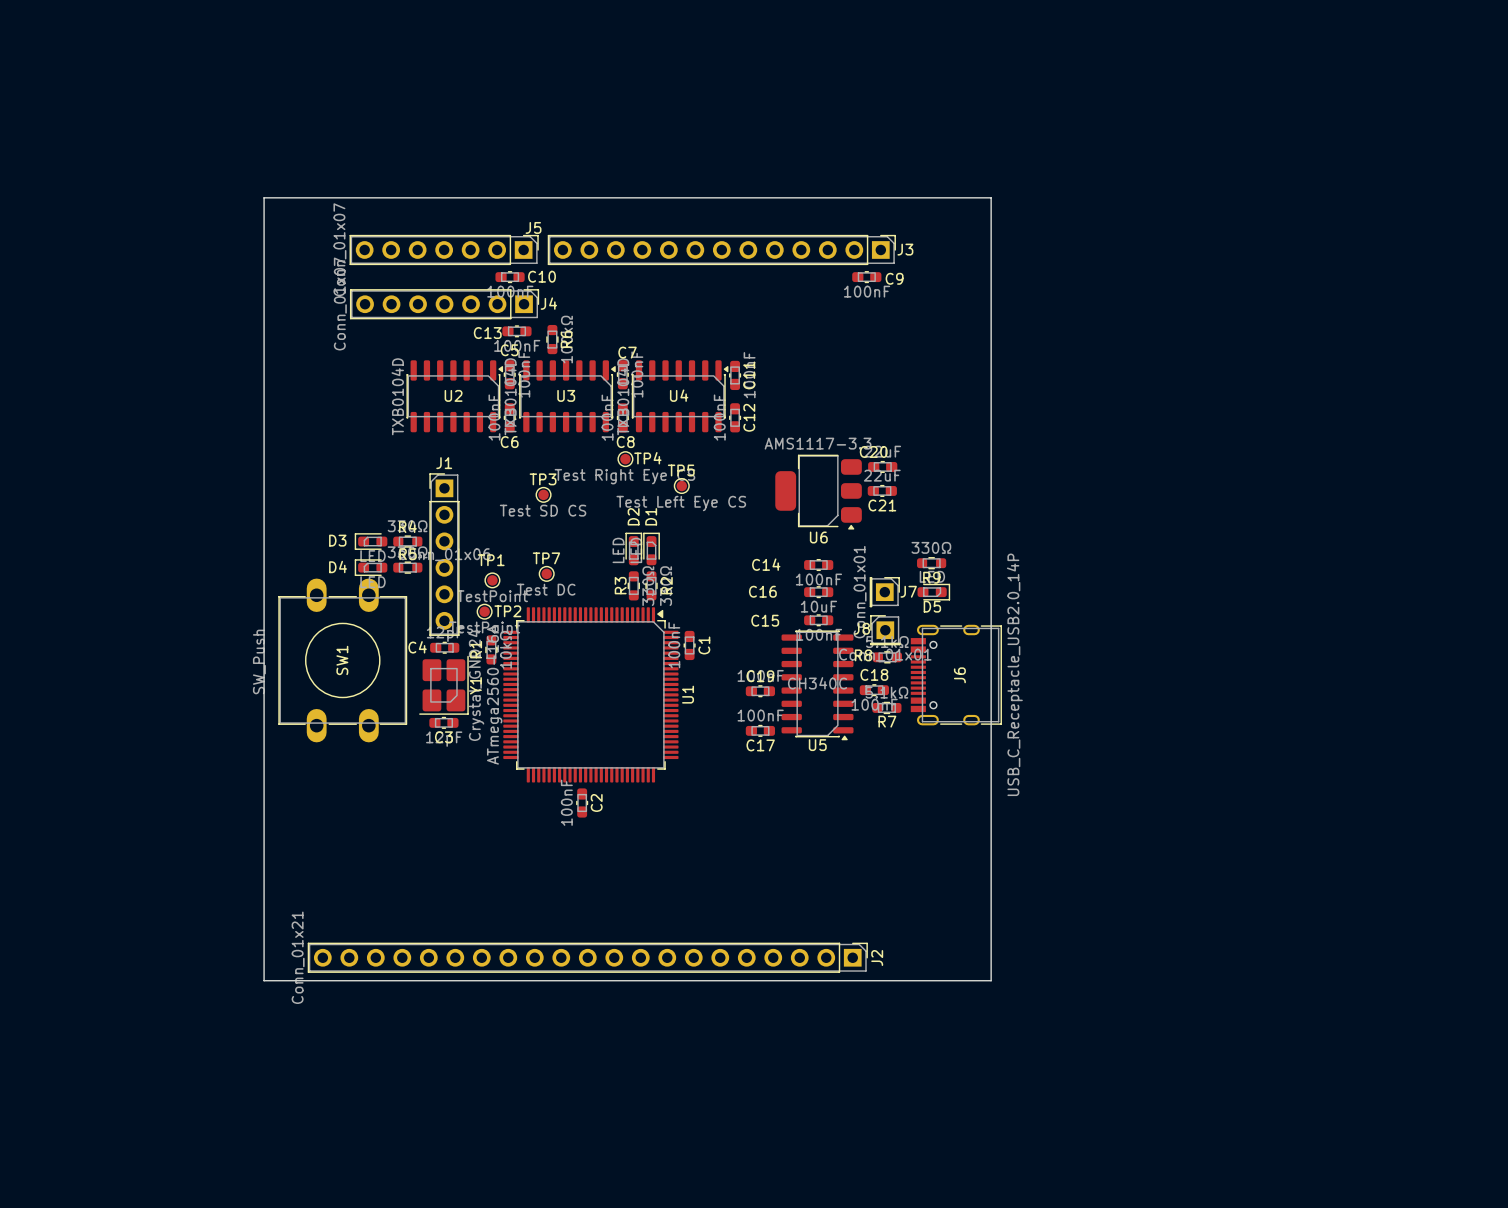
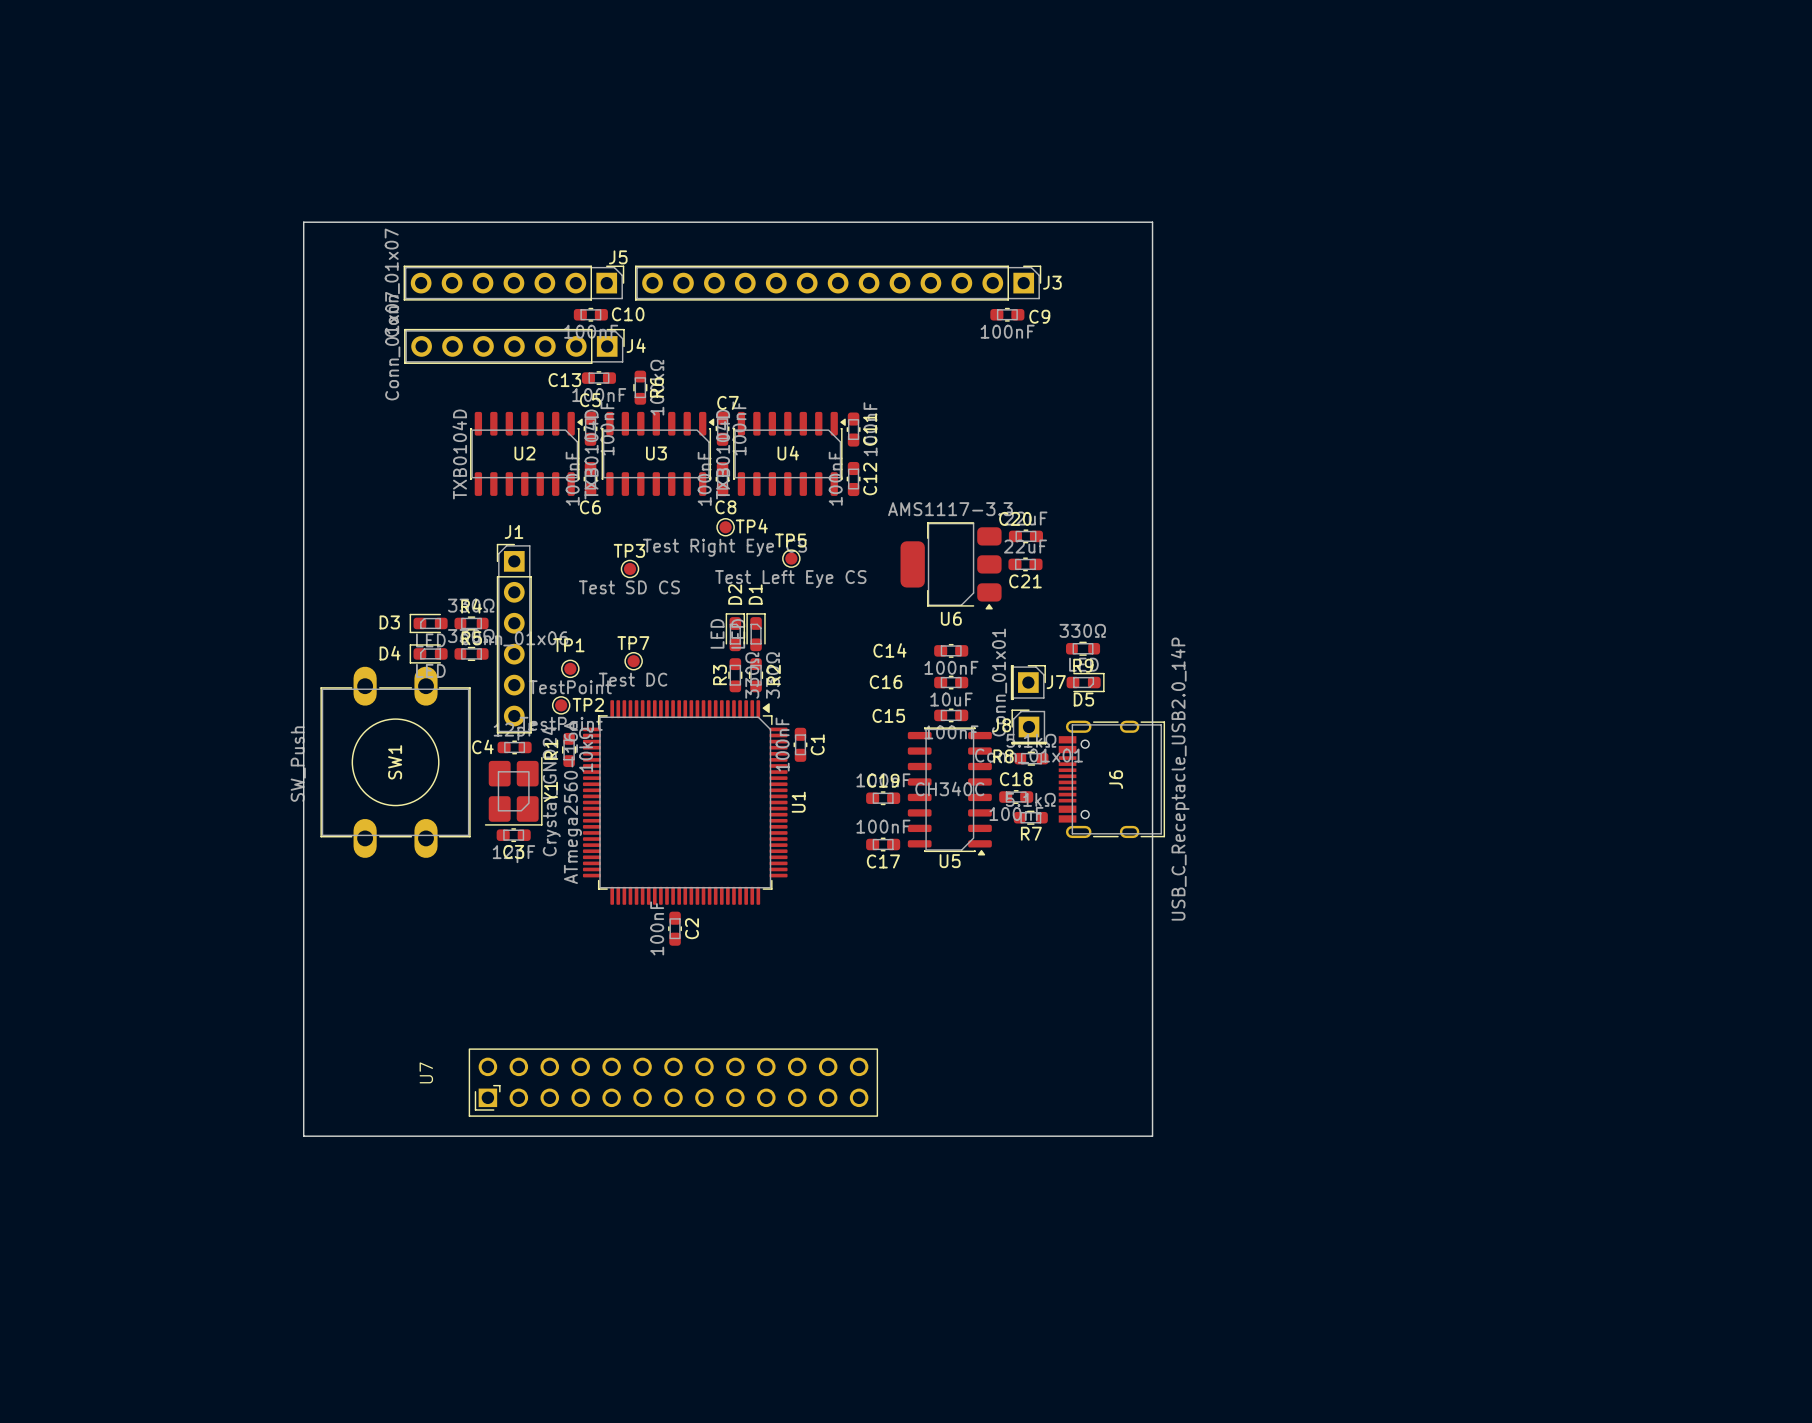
U7: none -> (673, 1082)
J2: Conn_01x21 (587, 957) -> none

